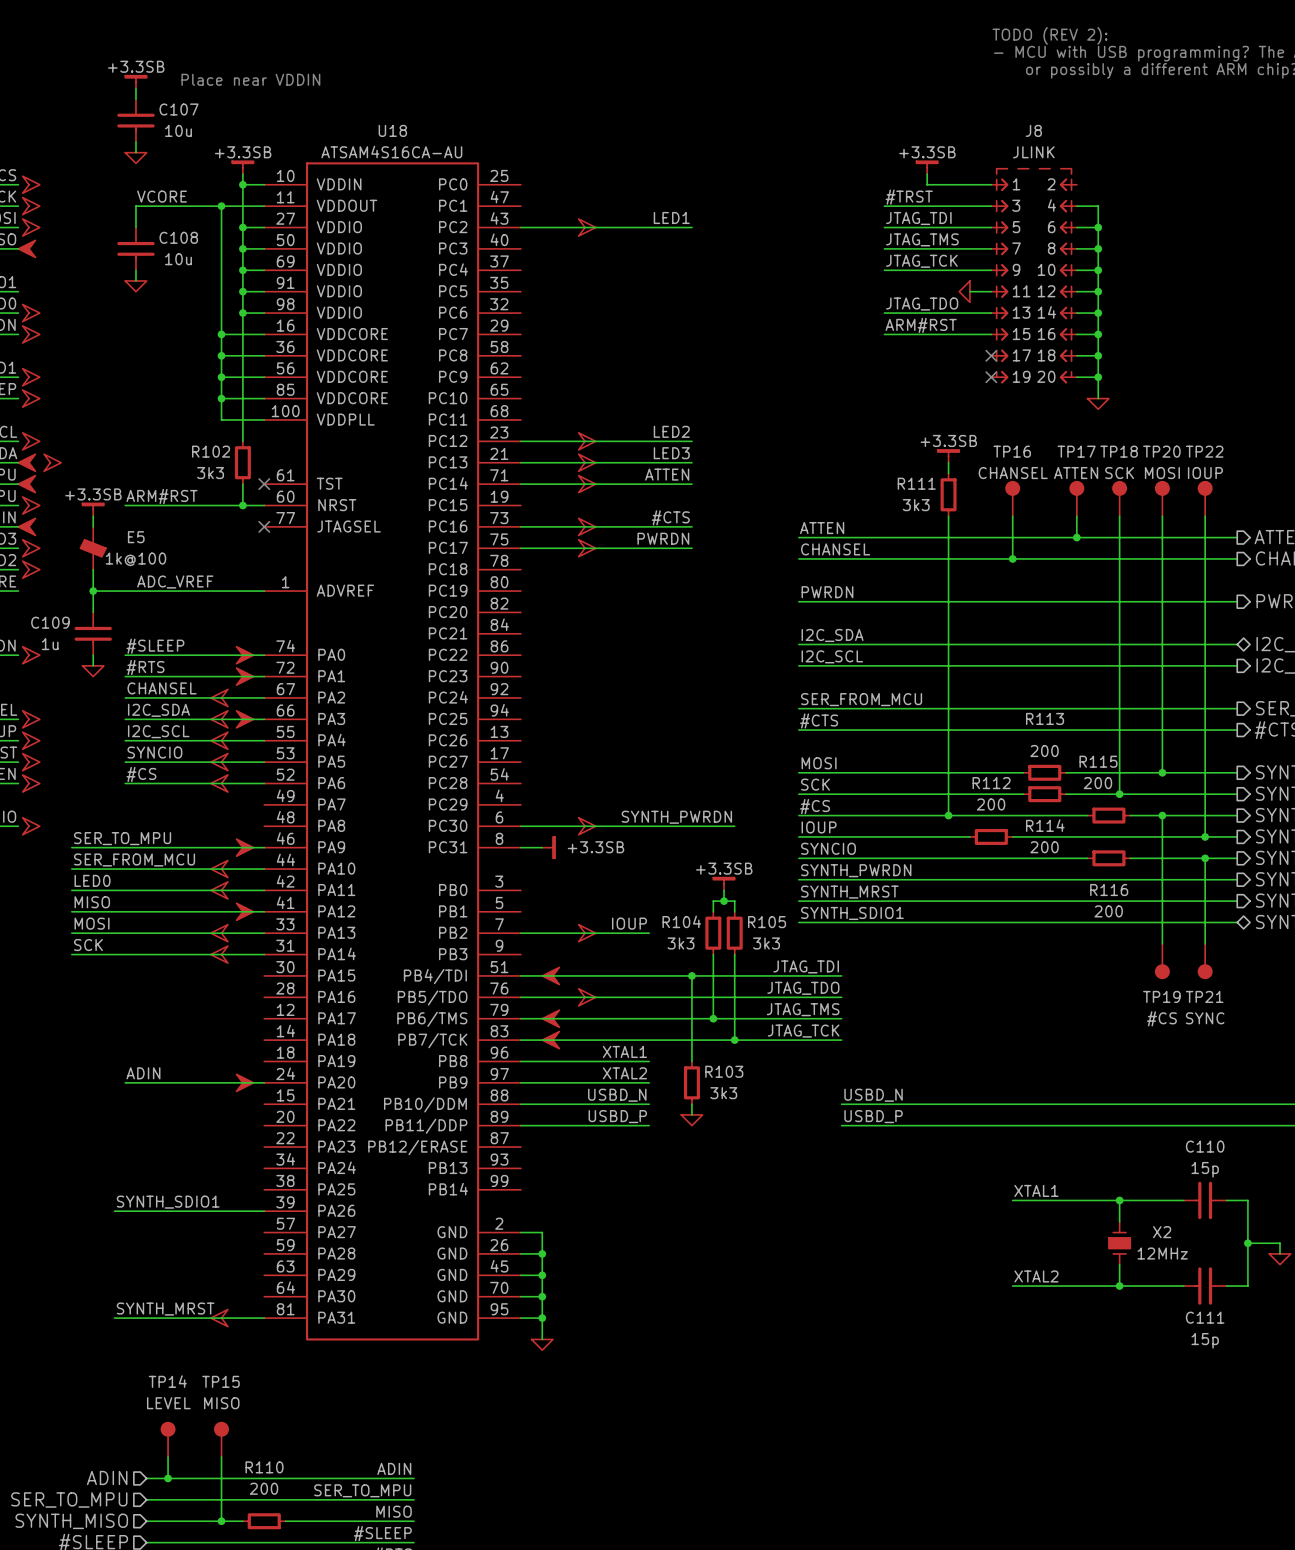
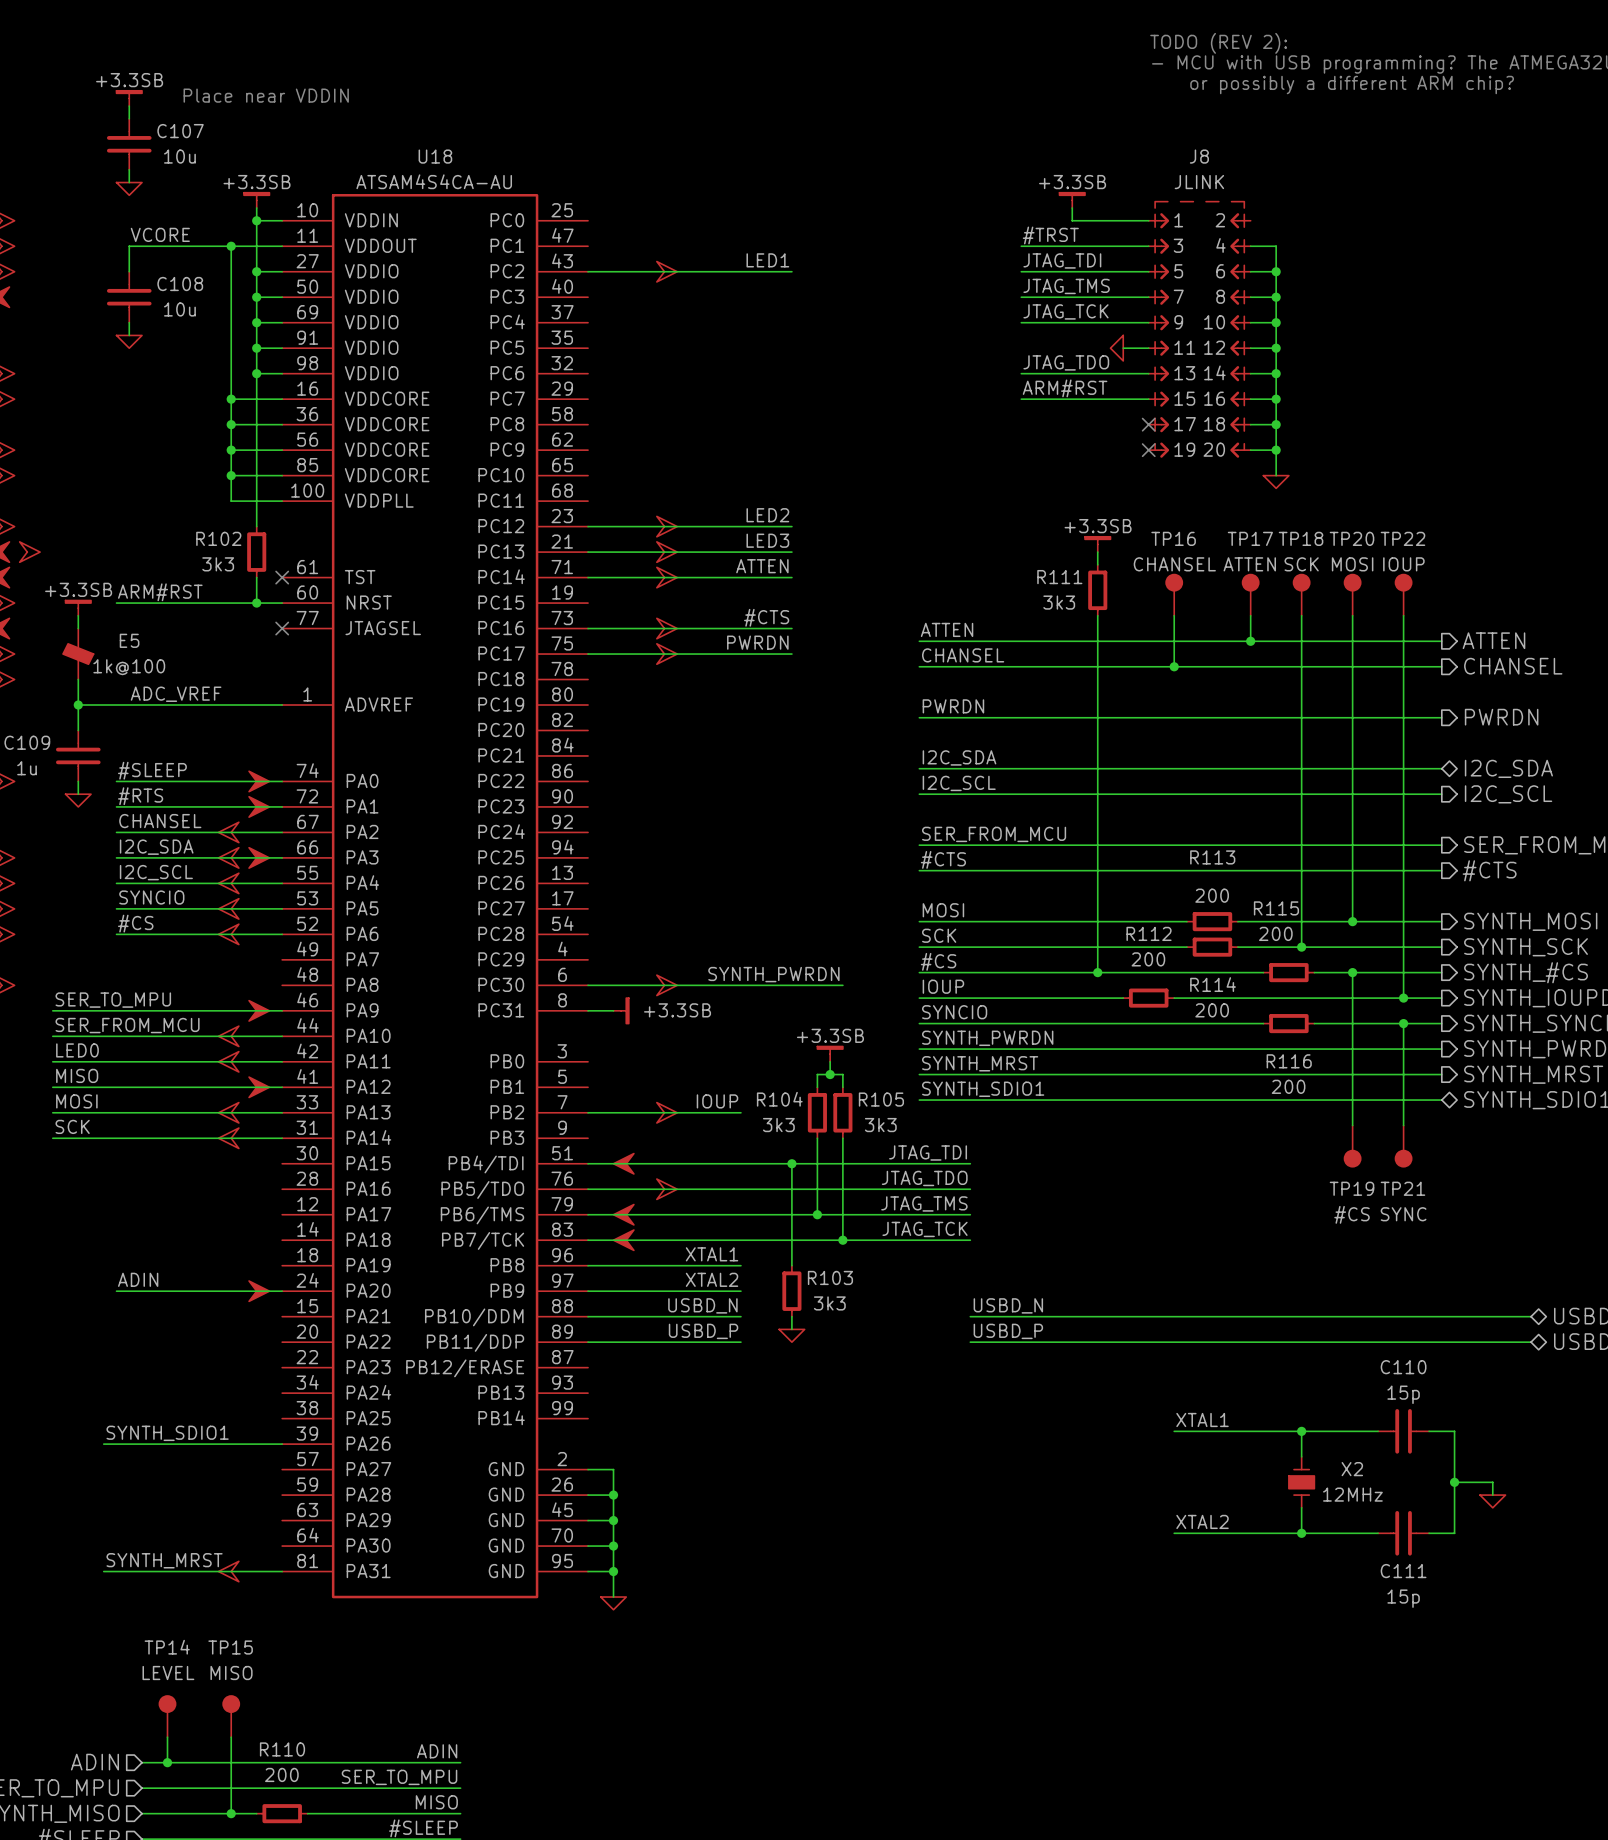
U18 value: ATSAM4S16CA-AU (391, 152) -> ATSAM4S4CA-AU (434, 181)

